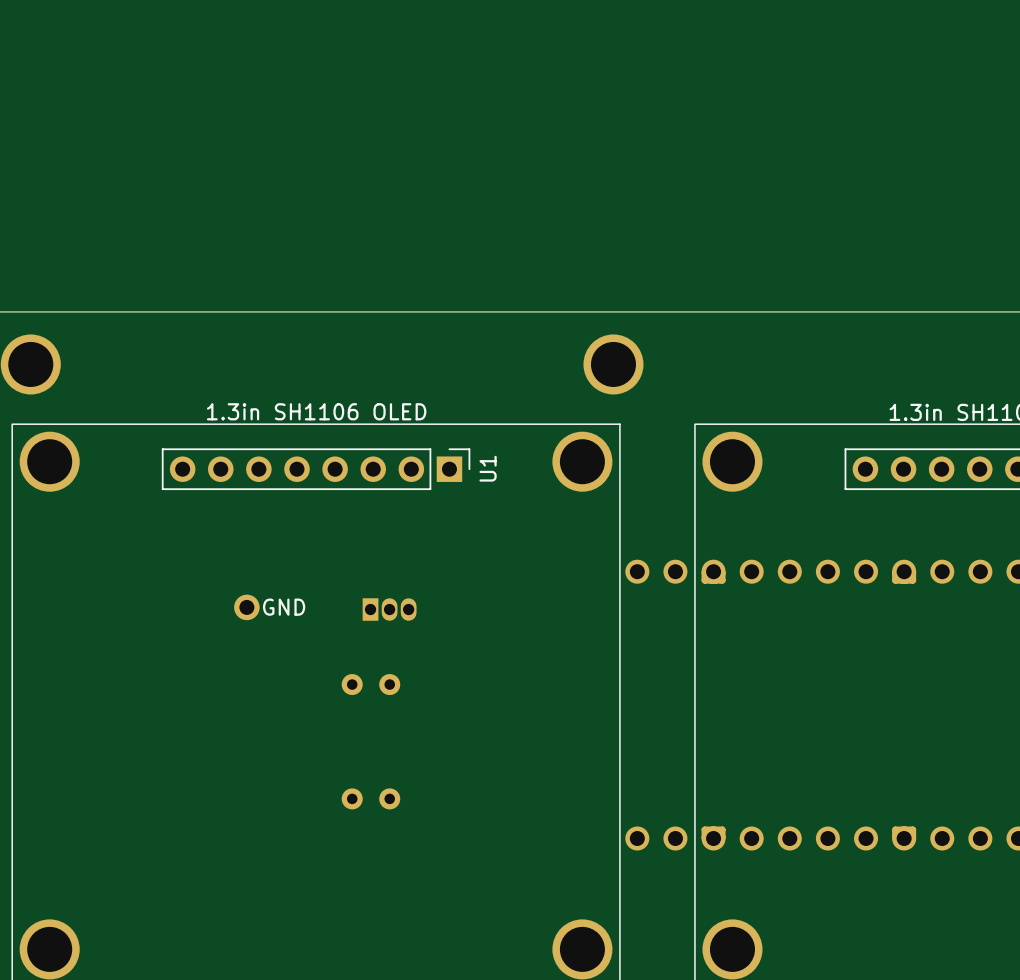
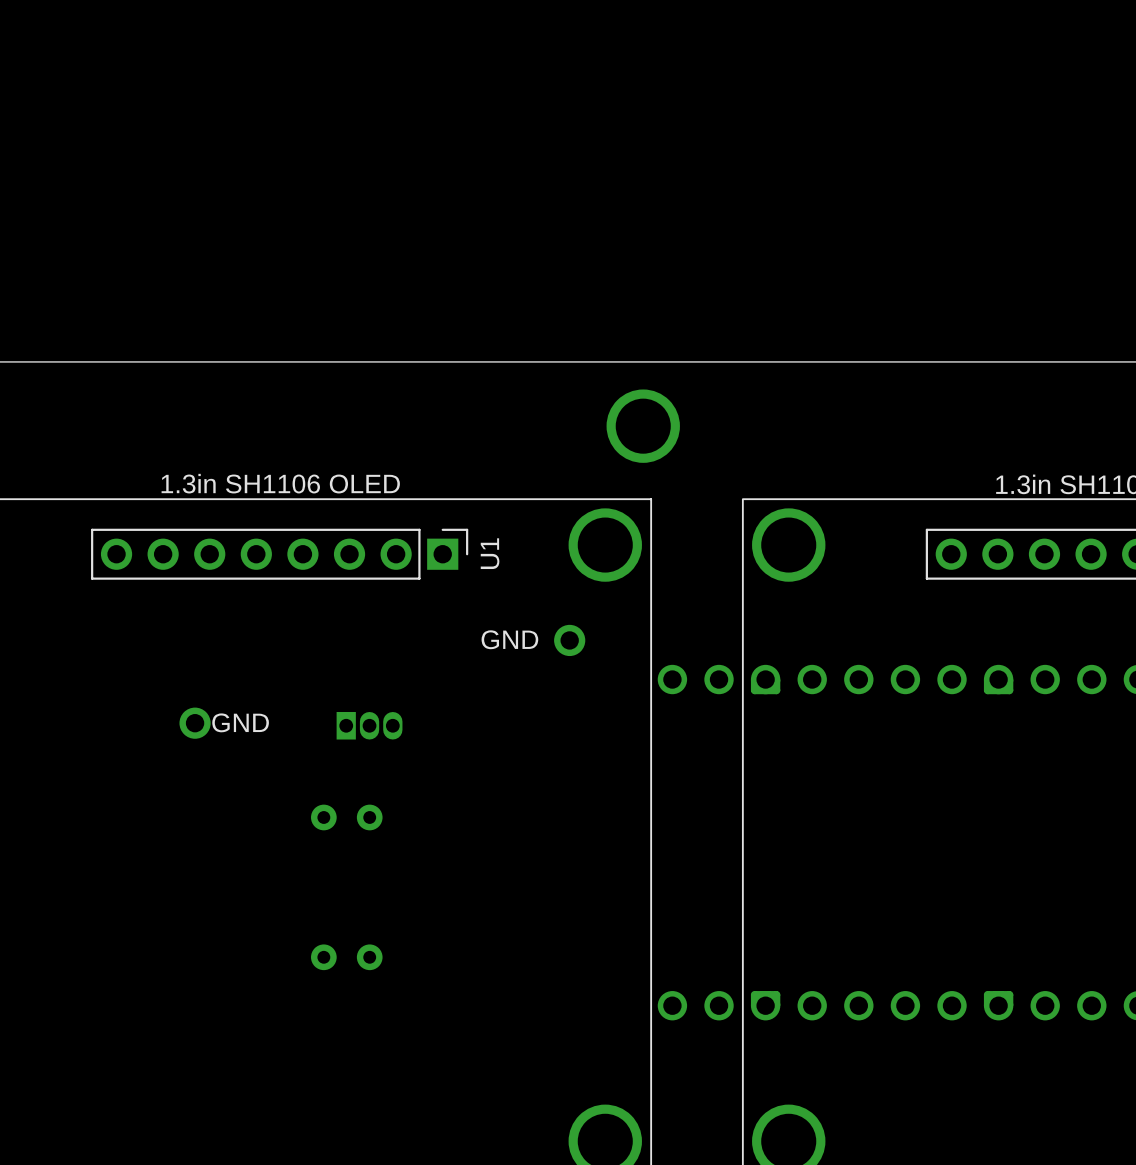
text: none -> GND (509, 639)
part: none -> (569, 640)

